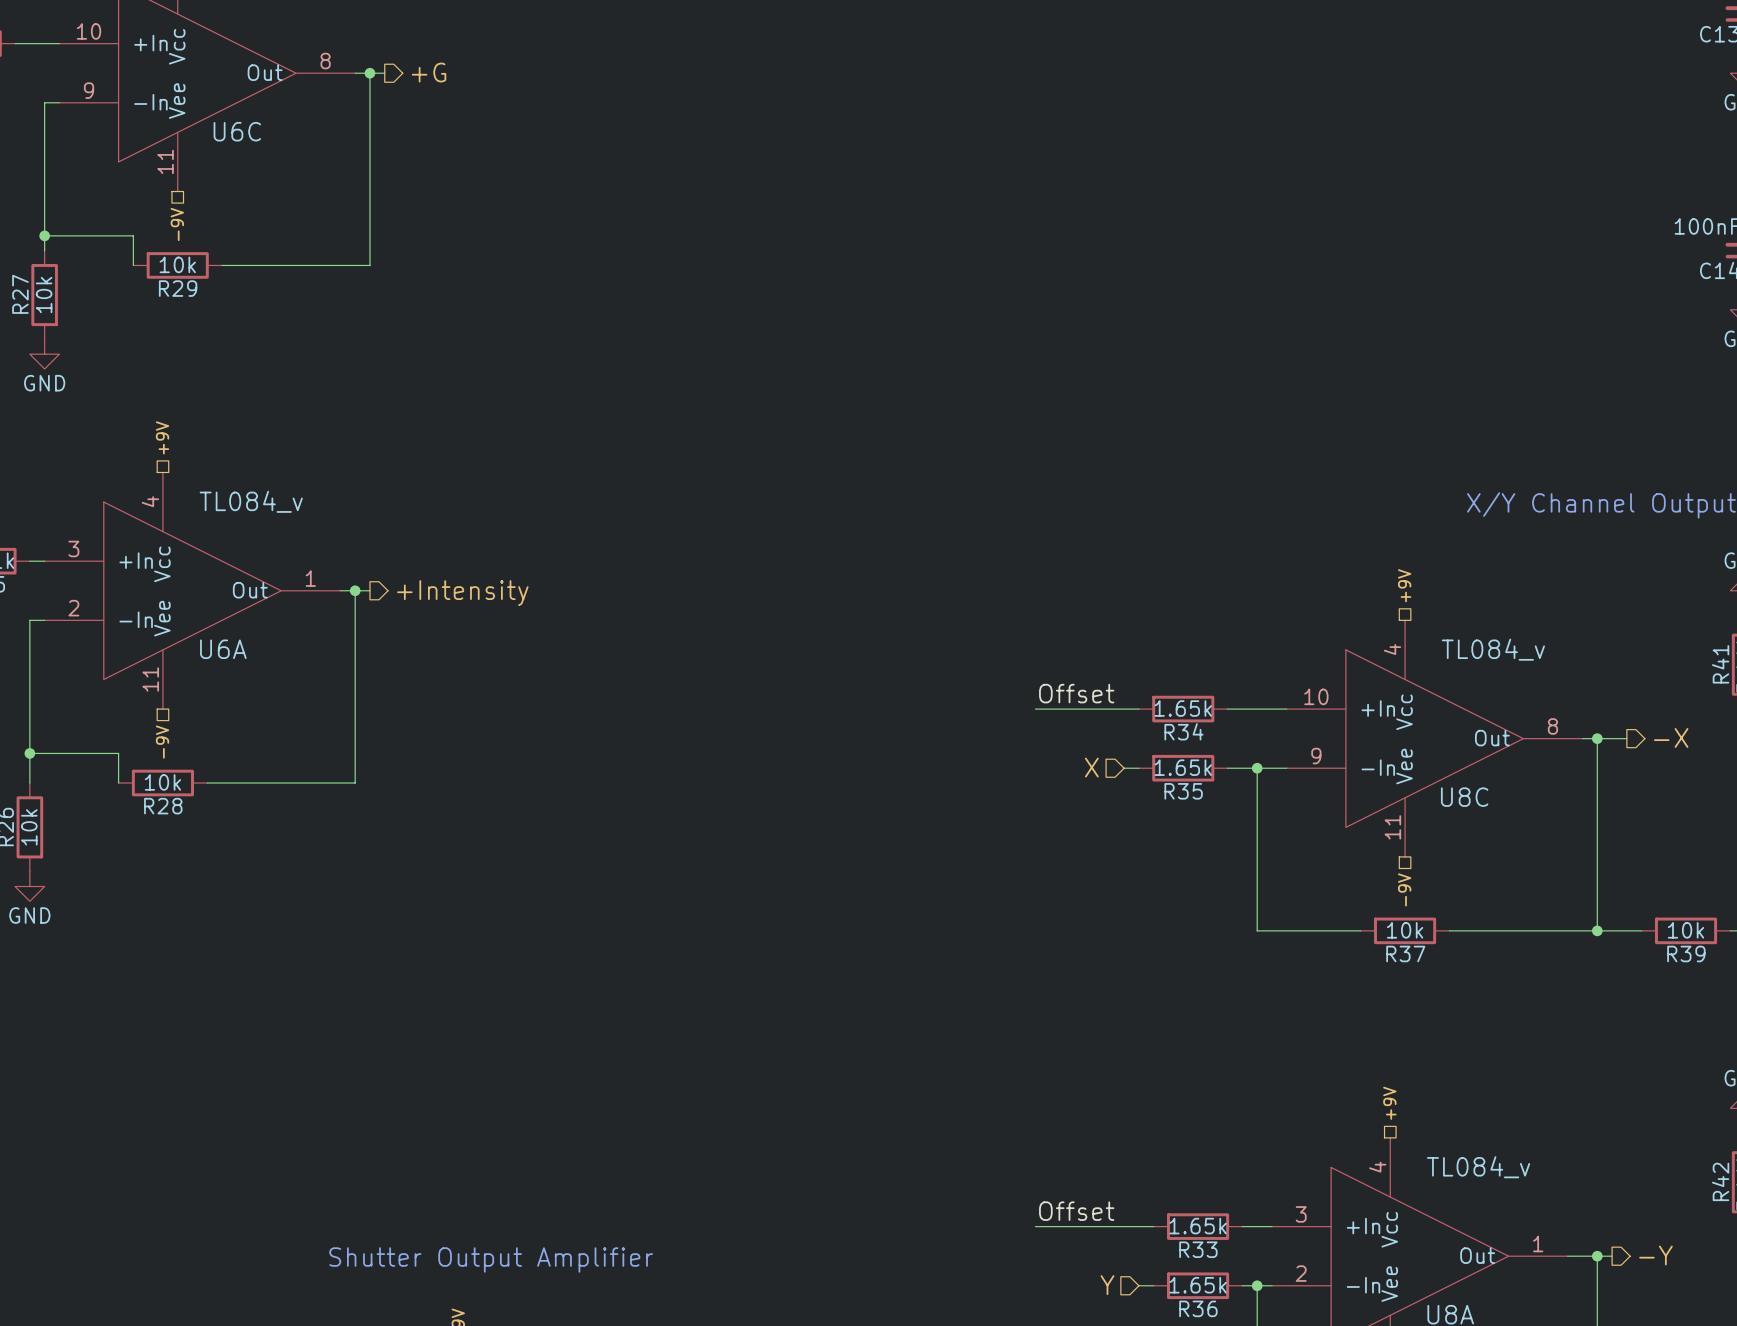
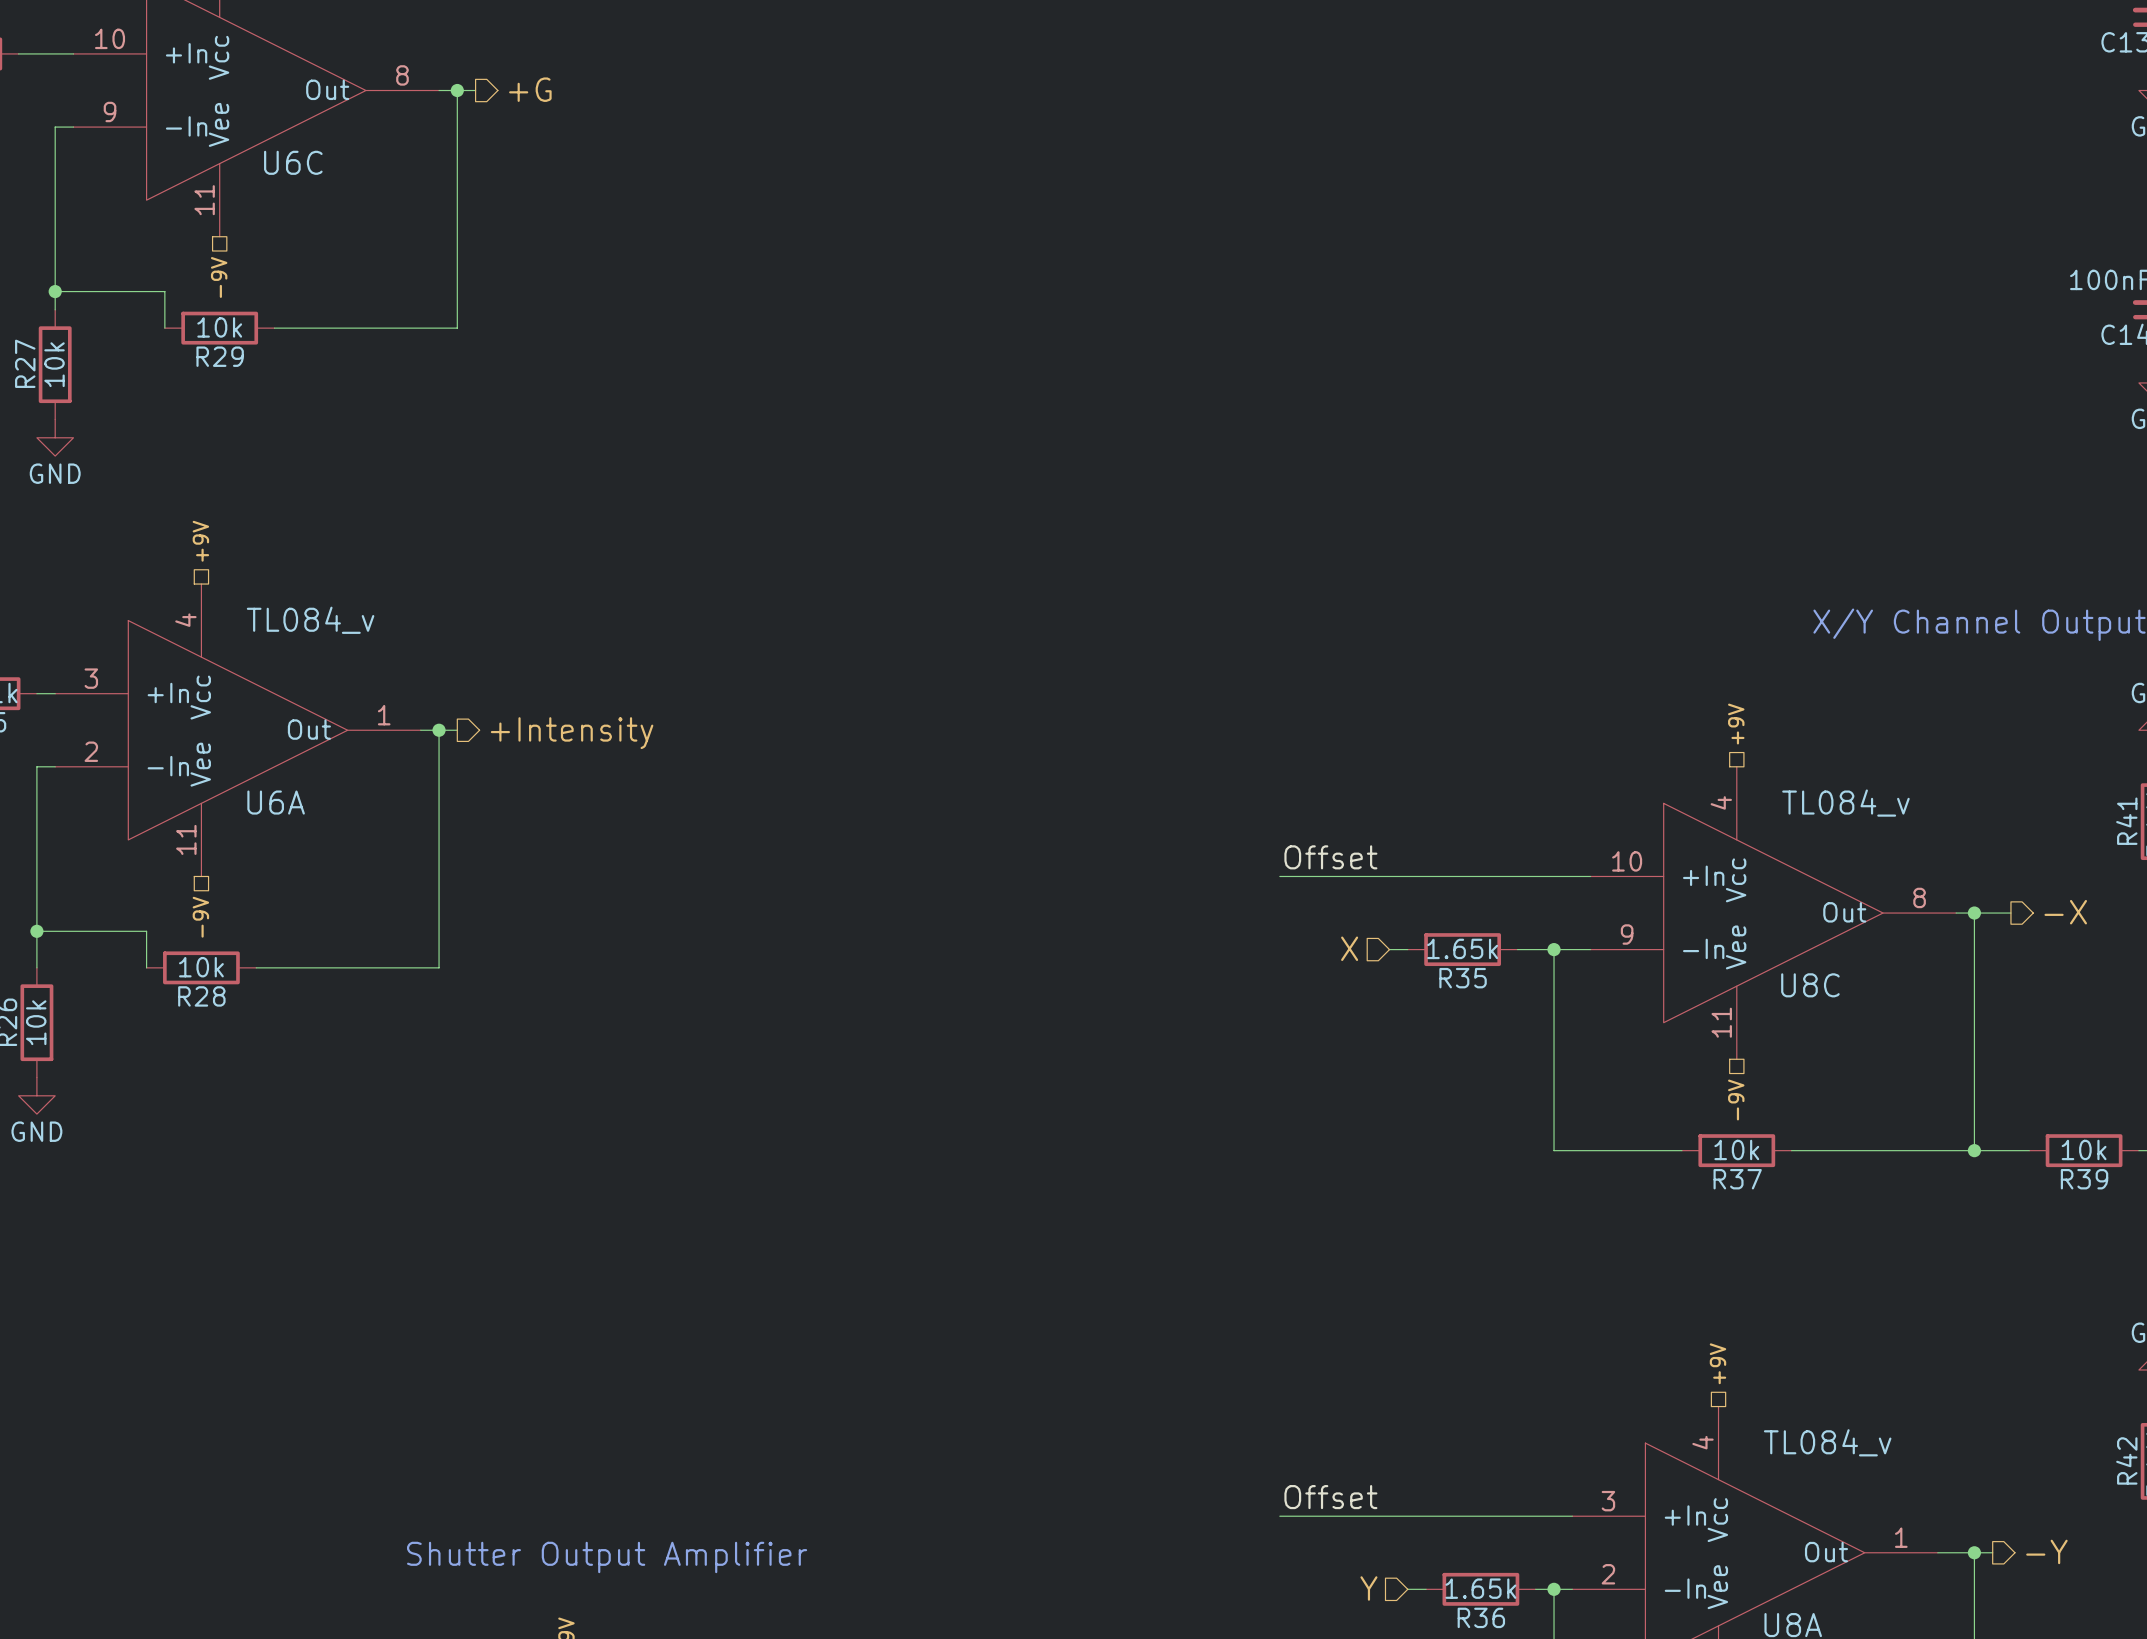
wire: none -> (1407, 876) (1517, 876)
R34: 1.65k (1183, 709) -> none
wire: none -> (1426, 1516) (1535, 1516)
R33: 1.65k (1198, 1226) -> none

